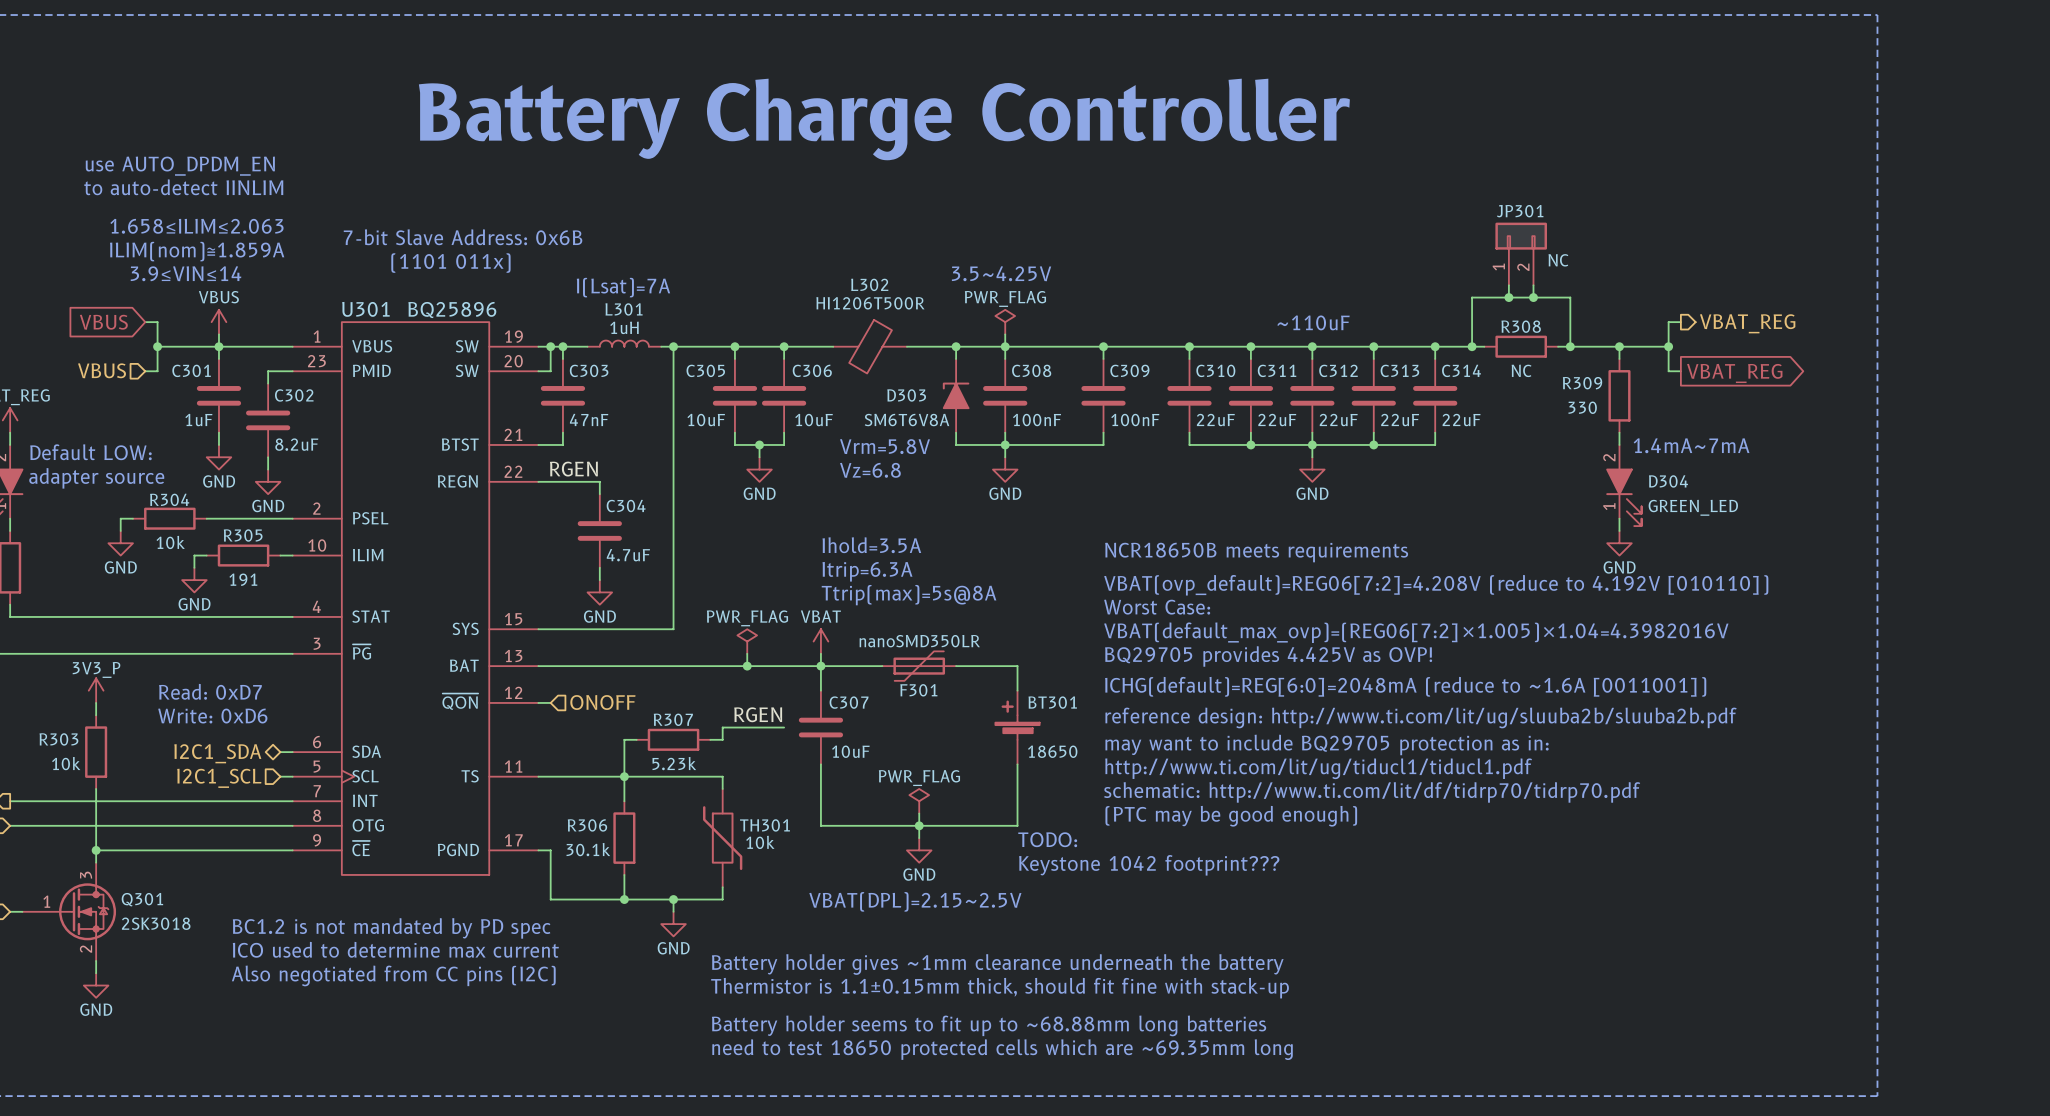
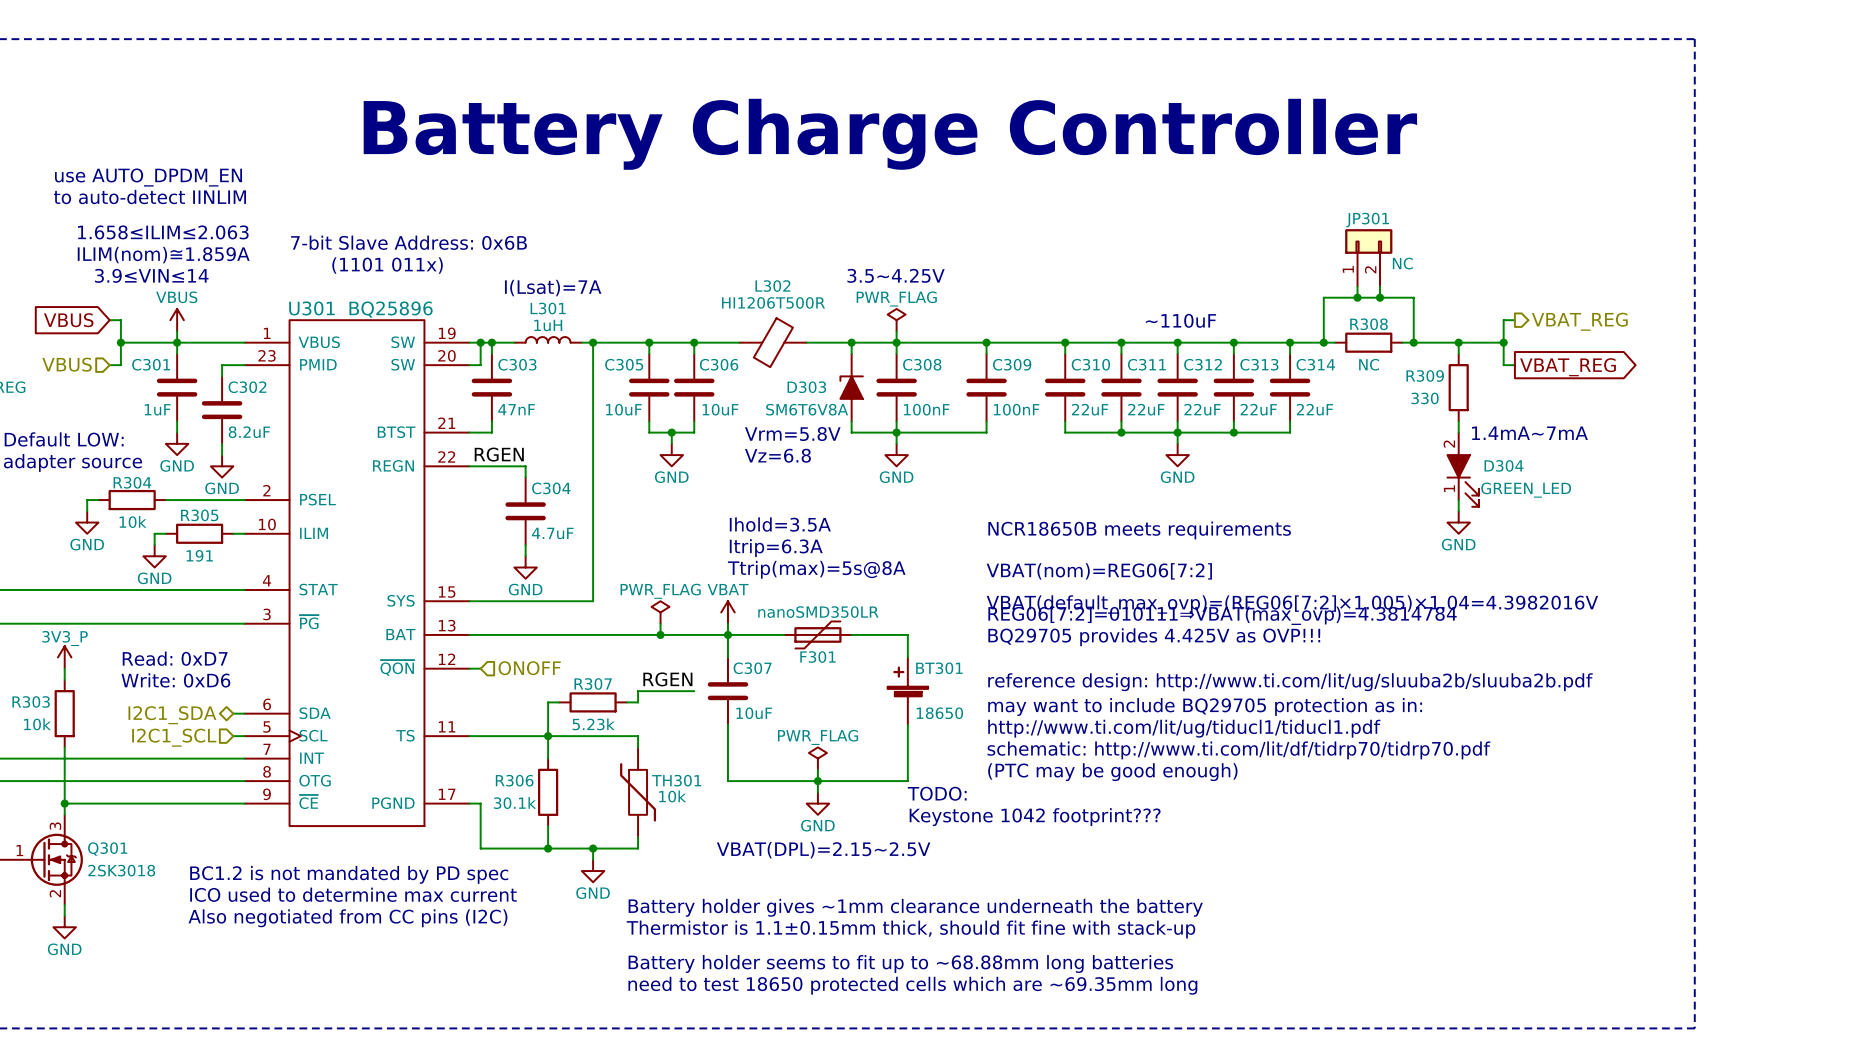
text: VBAT(ovp_default)=REG06[7:2]=4.208V (reduce to 4.192V [010110]) (1436, 585) -> none
text: none -> VBAT(nom)=REG06[7:2] (1099, 571)
text: Worst Case: (1157, 607) -> none
text: none -> REG06[7:2]=010111⇒VBAT(max_ovp)=4.3814784 (1222, 615)
text: BQ29705 provides 4.425V as OVP! (1268, 656) -> BQ29705 provides 4.425V as OVP!!! (1154, 637)
text: ICHG(default)=REG[6:0]=2048mA (reduce to ~1.6A [0011001]) (1405, 686) -> none

